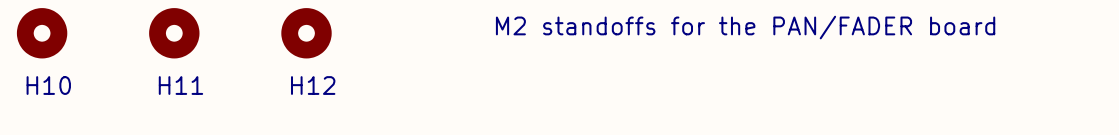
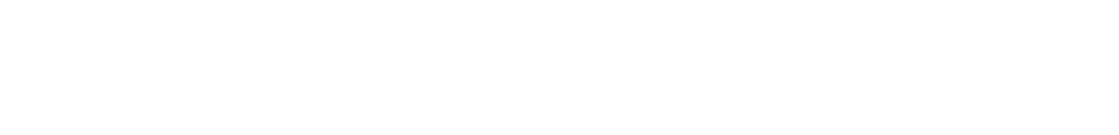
text: M2 standoffs for the PAN/FADER board (745, 27) -> none
H10: (42, 33) -> none
H11: (174, 33) -> none
H12: (306, 33) -> none

